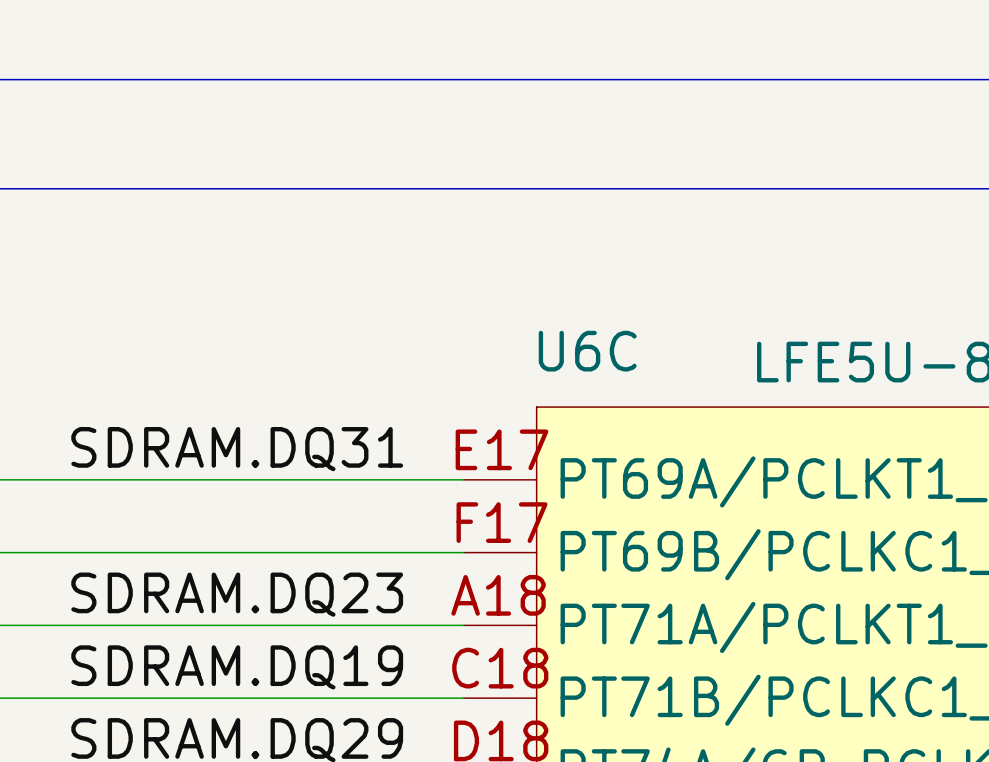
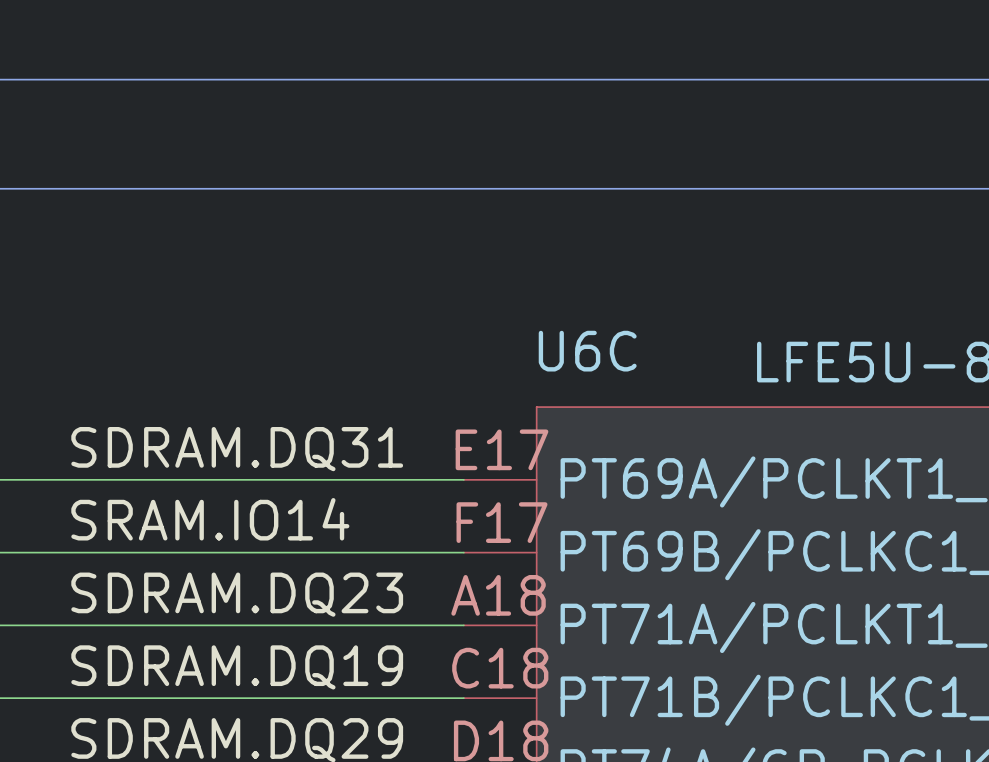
label: none -> SRAM.IO14 (210, 519)

